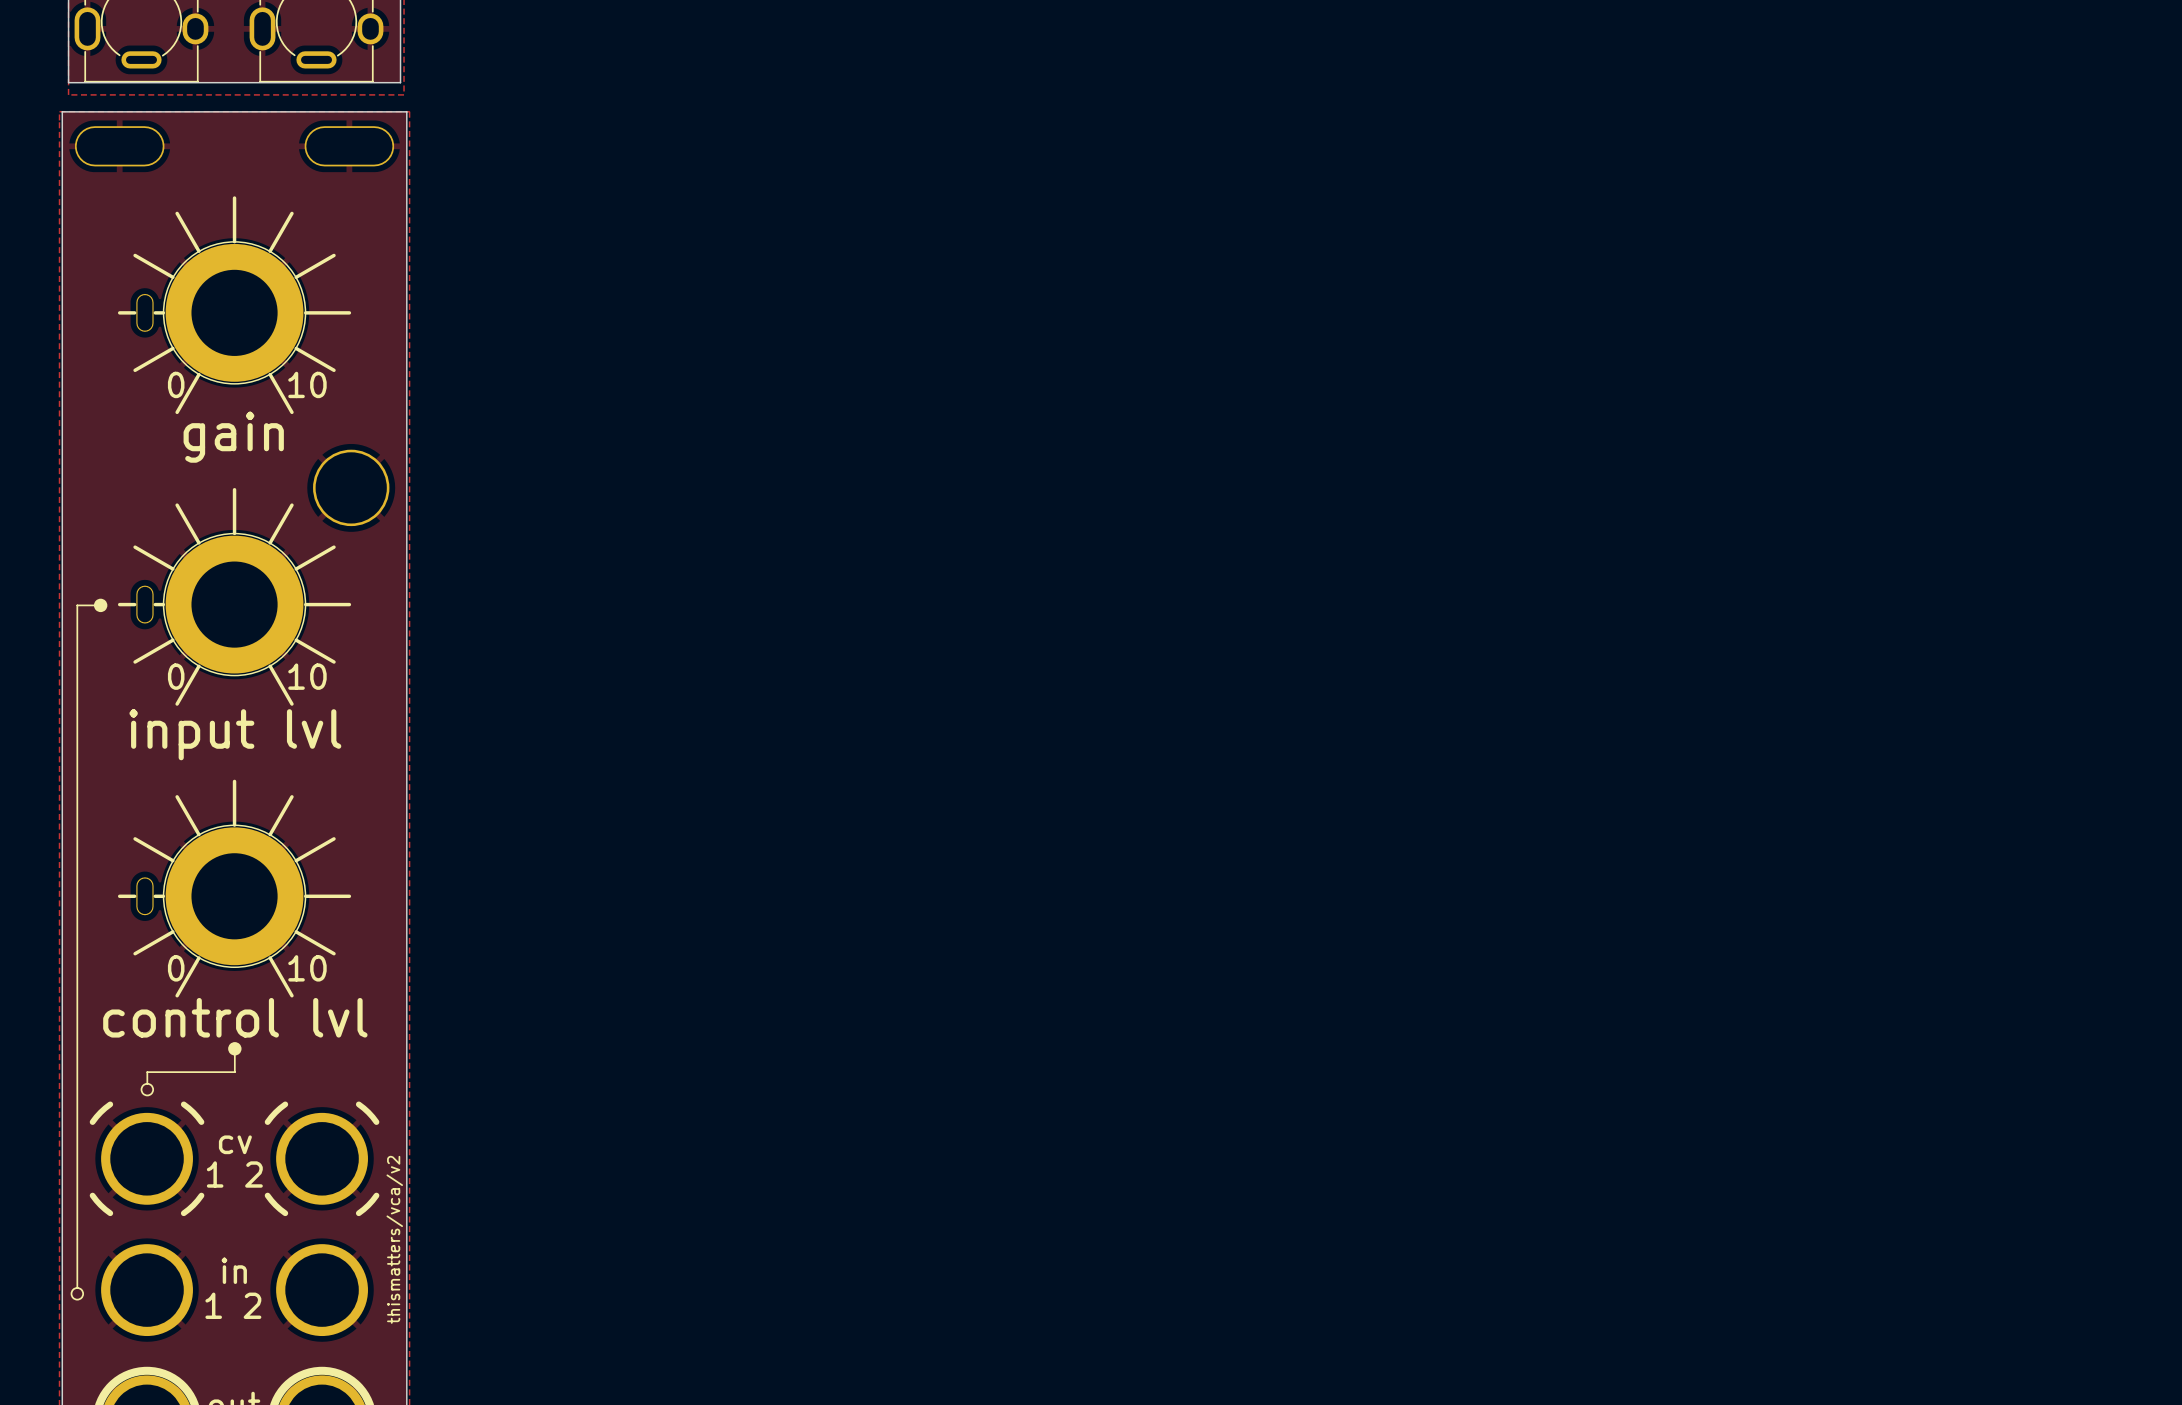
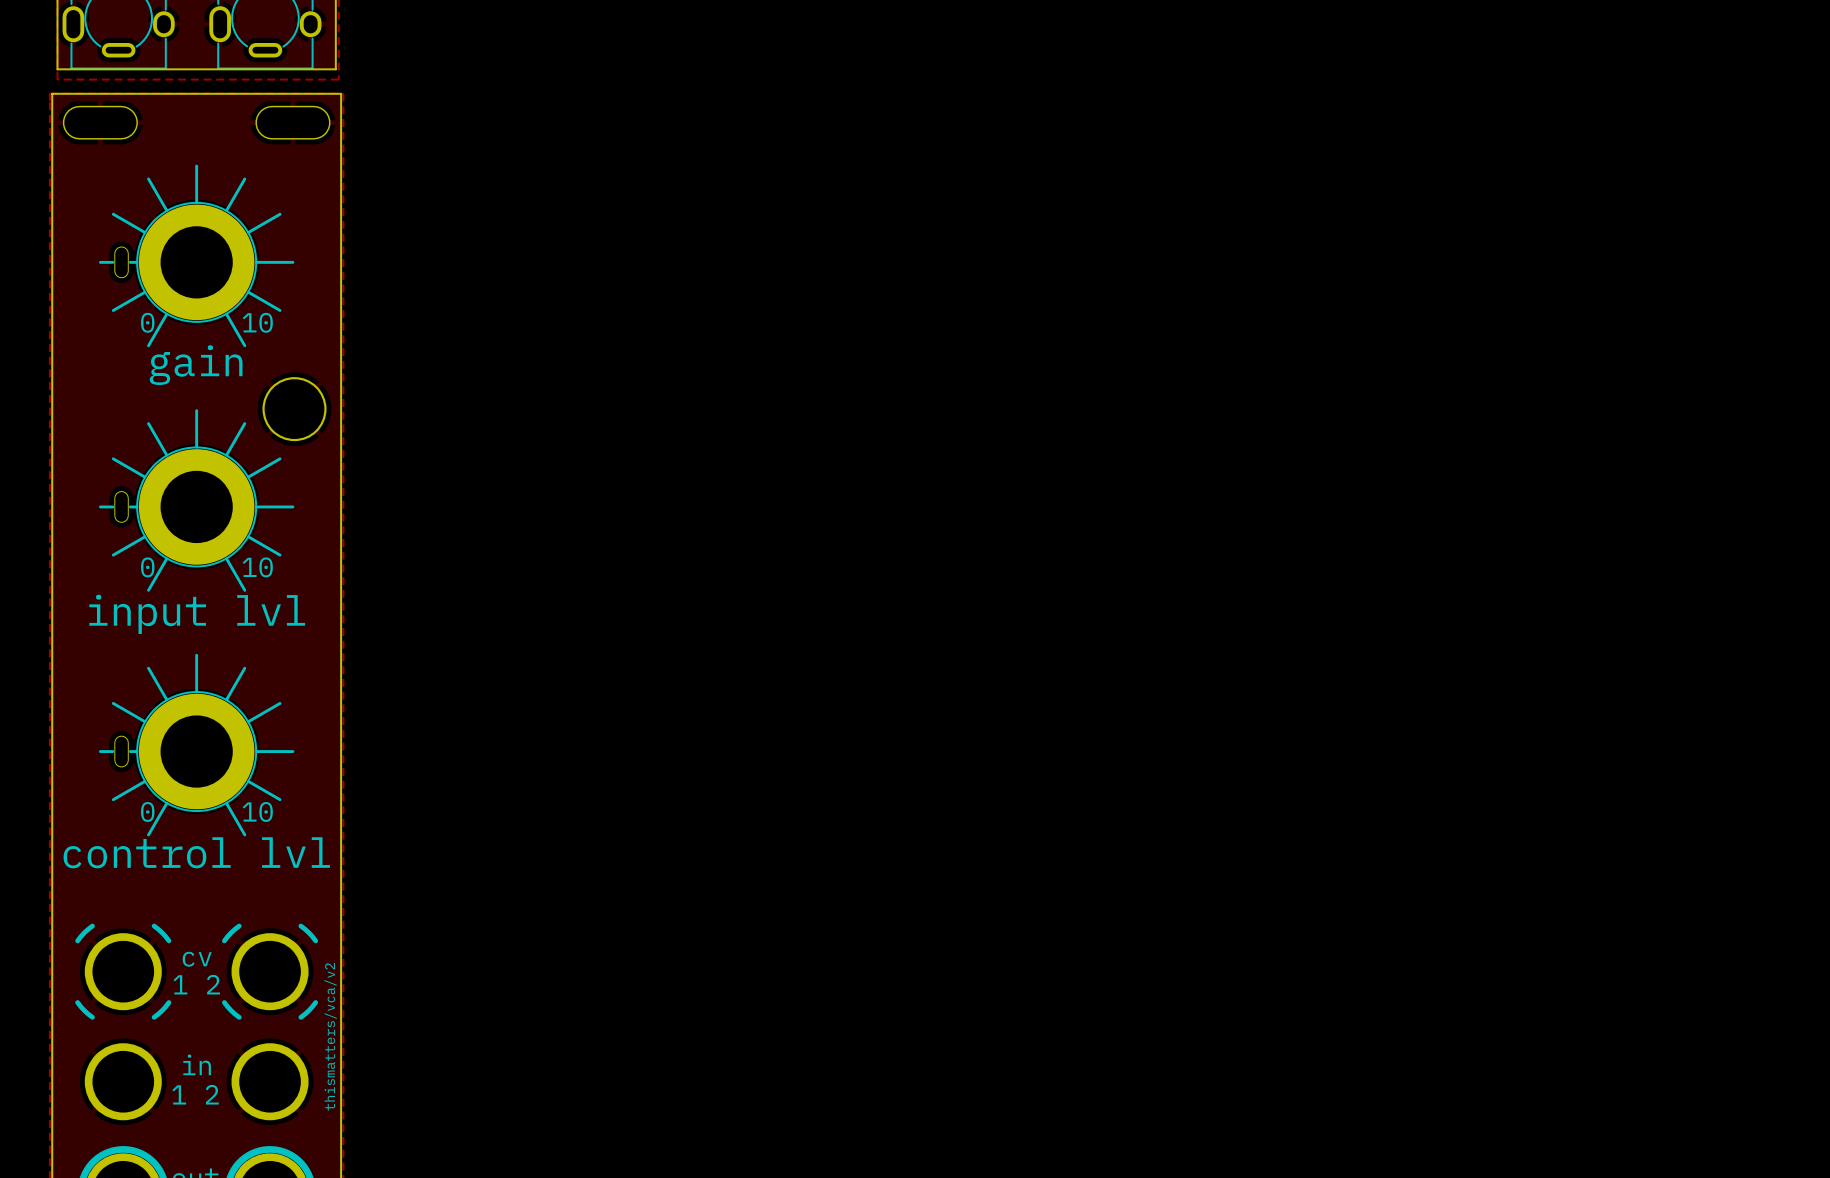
drawing: [93, 598, 108, 613] -> none
line: (94, 605) (77, 605) (77, 1287) -> none
drawing: [228, 1042, 242, 1056] -> none
line: (234, 1054) (234, 1072) (147, 1072) (147, 1083) -> none
drawing: [140, 1082, 155, 1097] -> none
drawing: [70, 1287, 85, 1301] -> none

